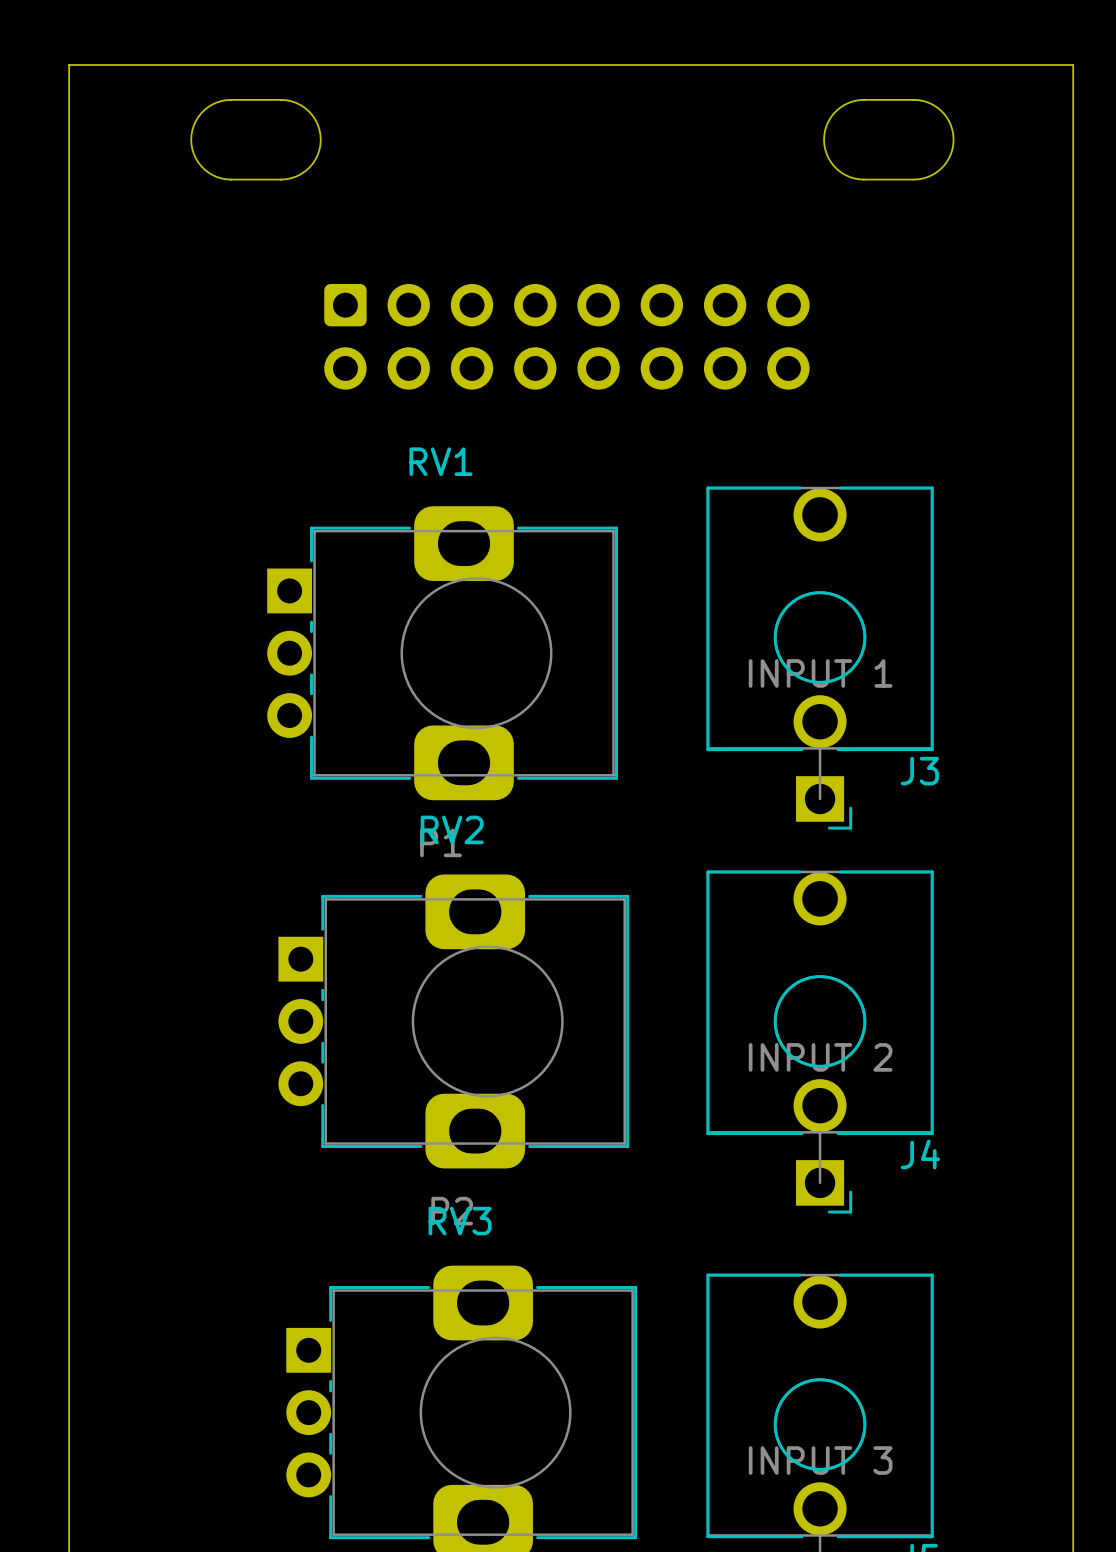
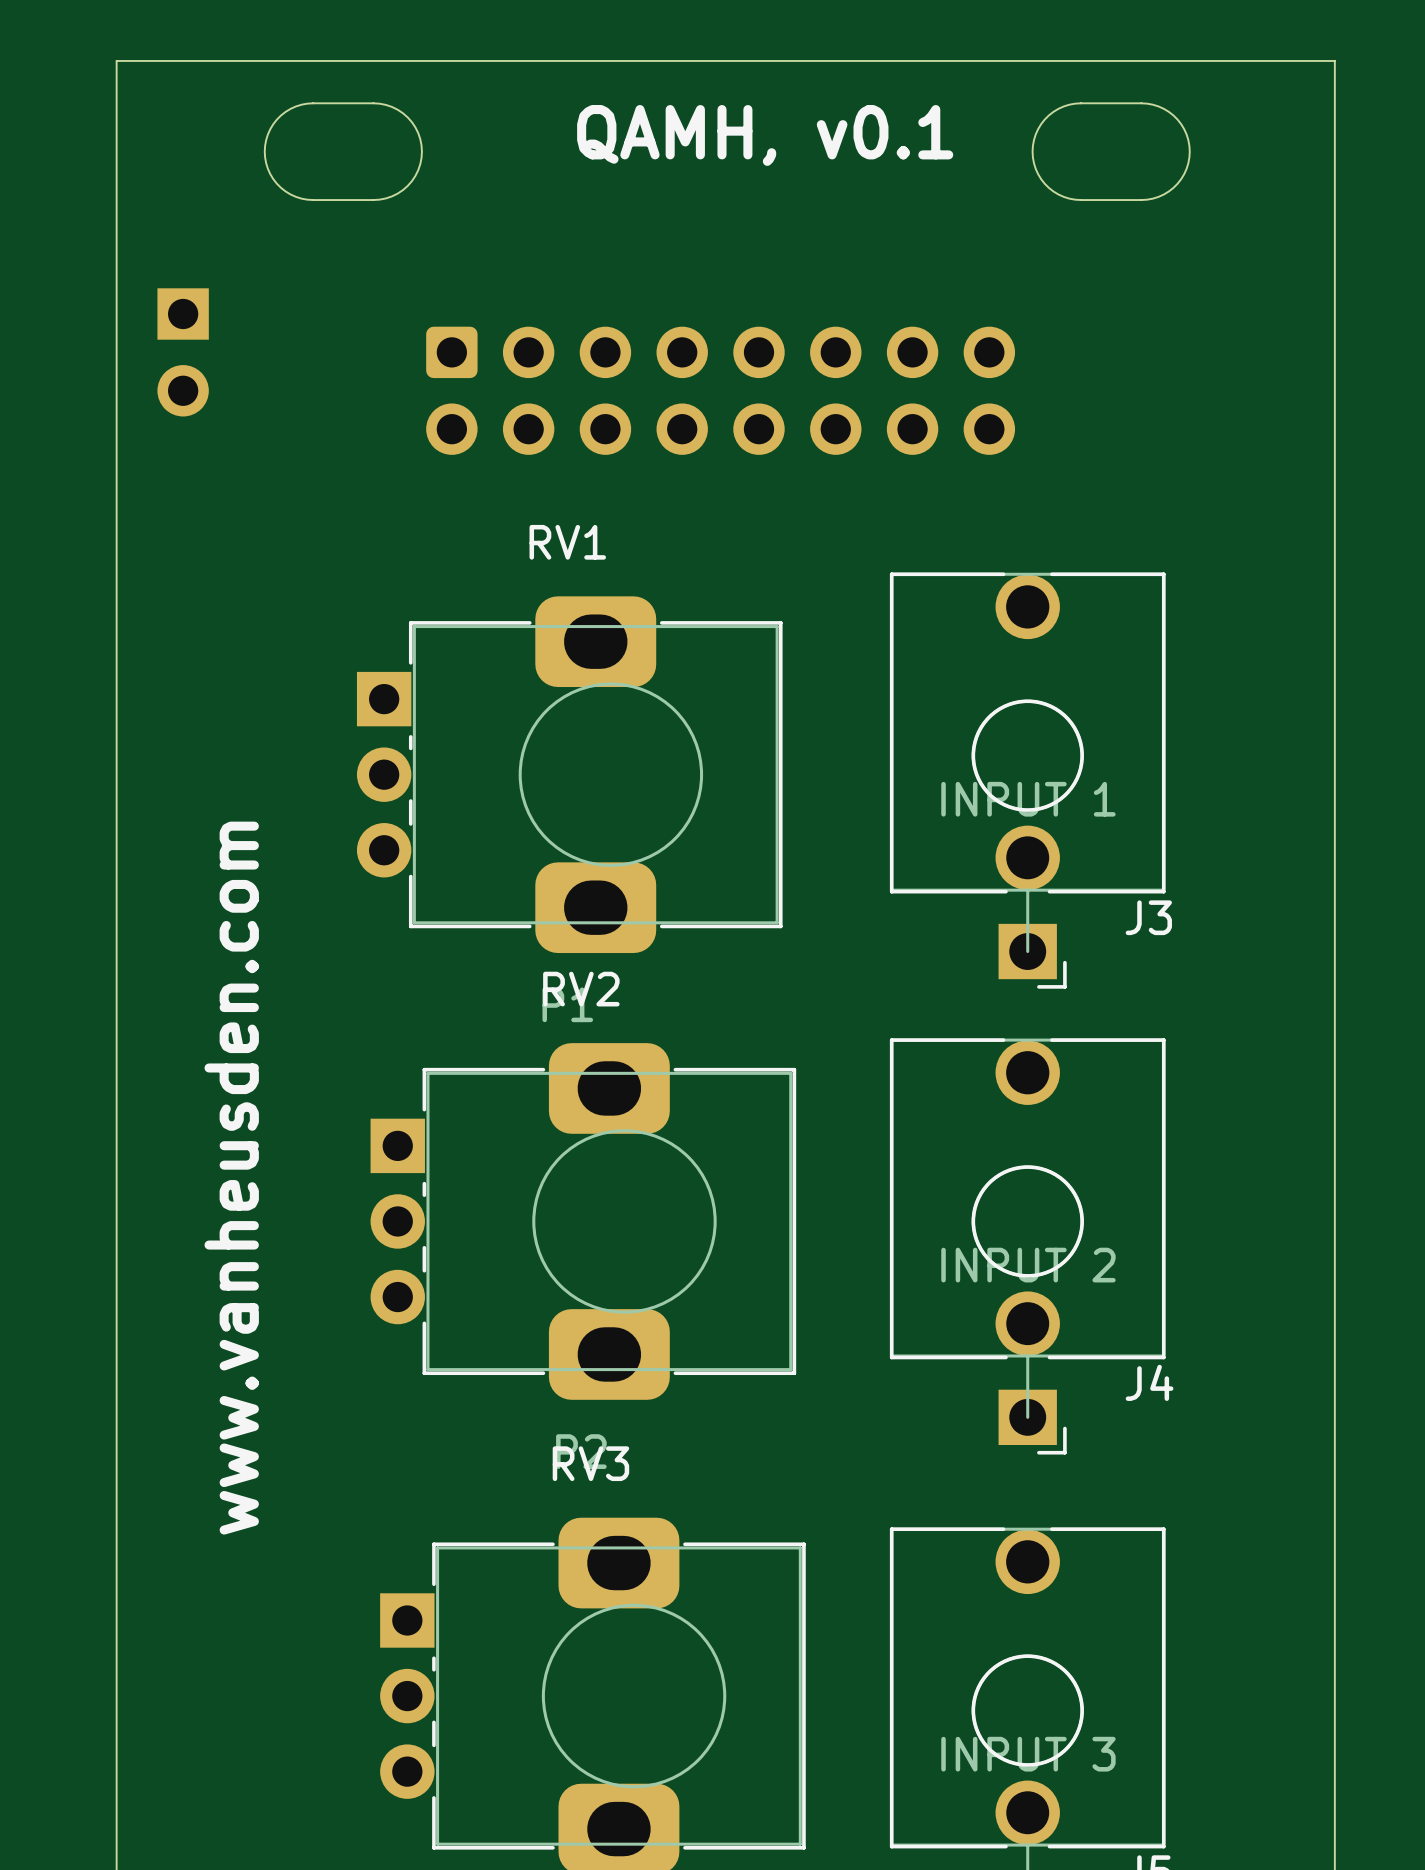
text: none -> QAMH, v0.1 (765, 135)
part: none -> (183, 352)
text: none -> www.vanheusden.com (231, 1178)

